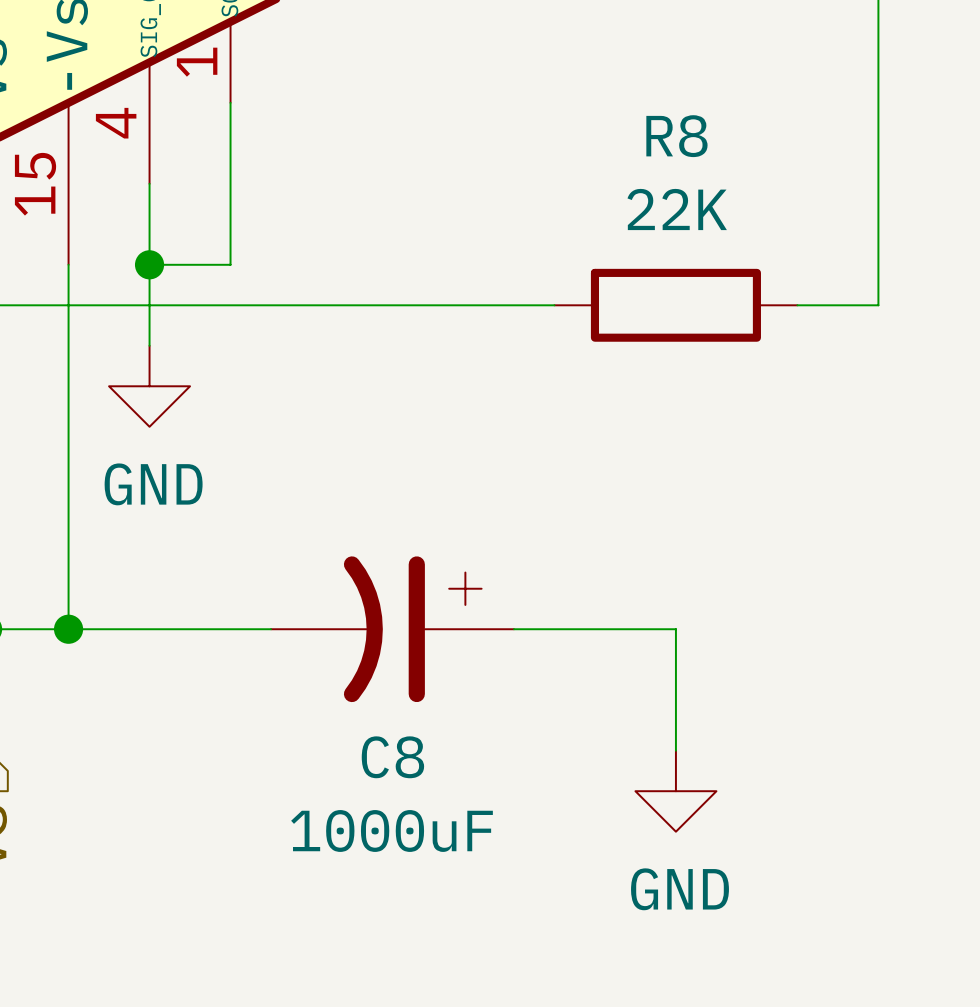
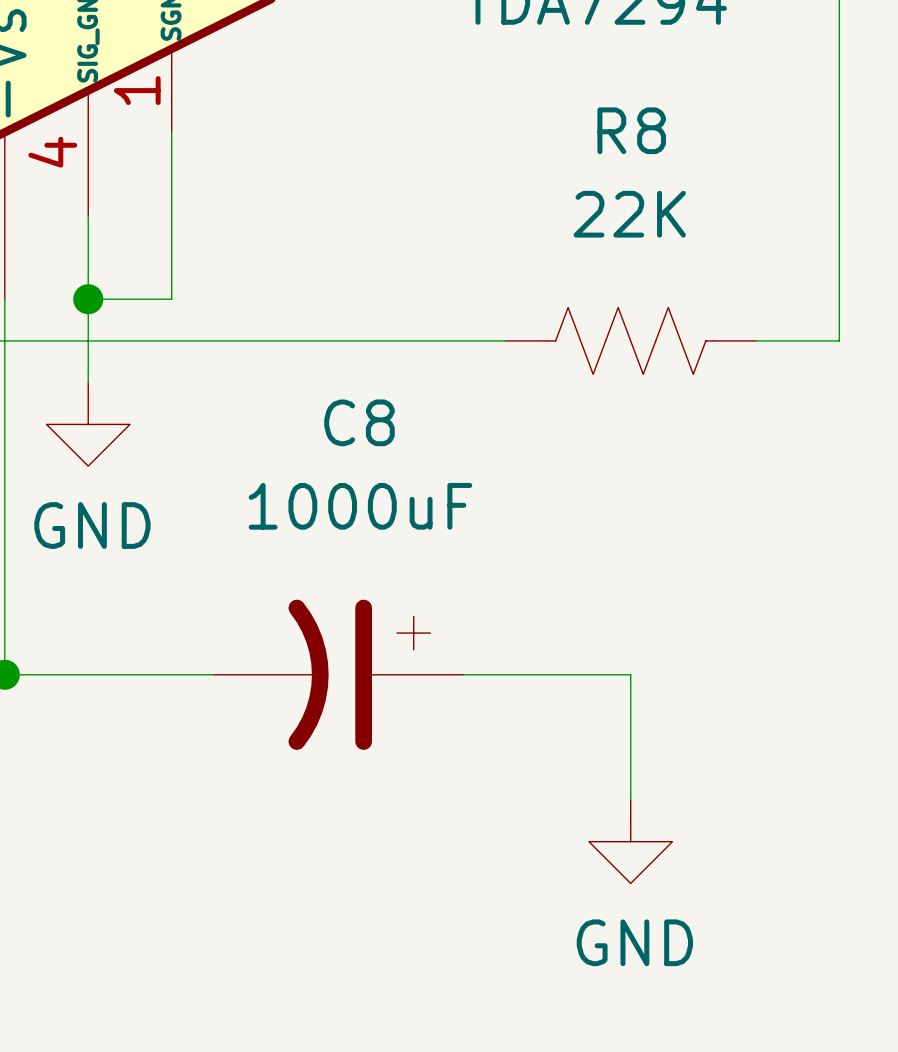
R8 symbol: [554, 268, 798, 342] -> [505, 307, 756, 375]
C8 name position: C8 (392, 757) -> C8 (359, 422)
C8 value position: 1000uF (392, 830) -> 1000uF (360, 506)

